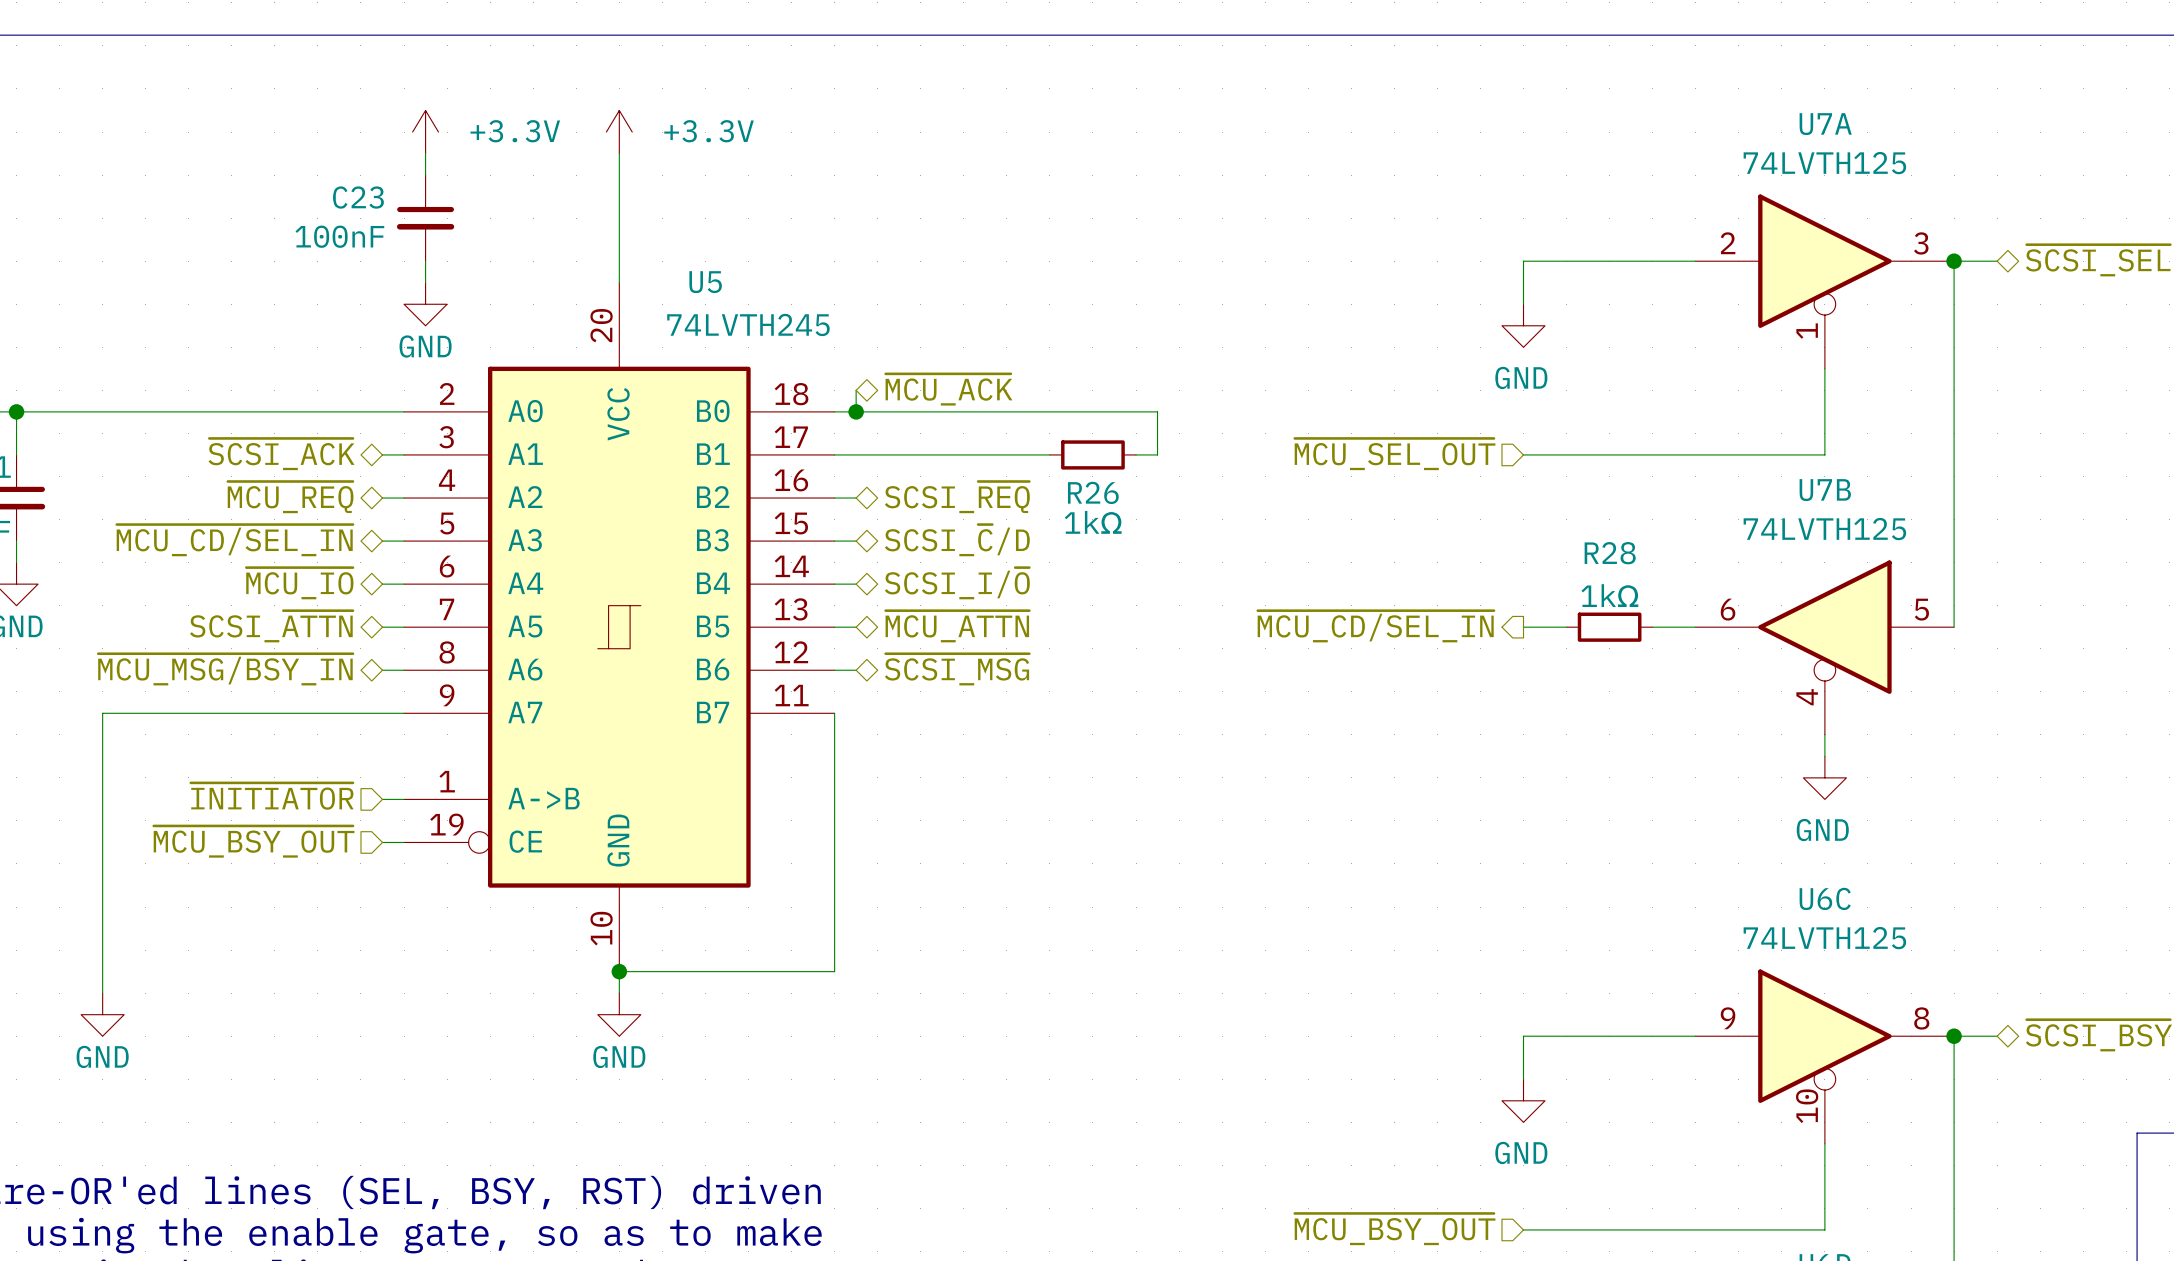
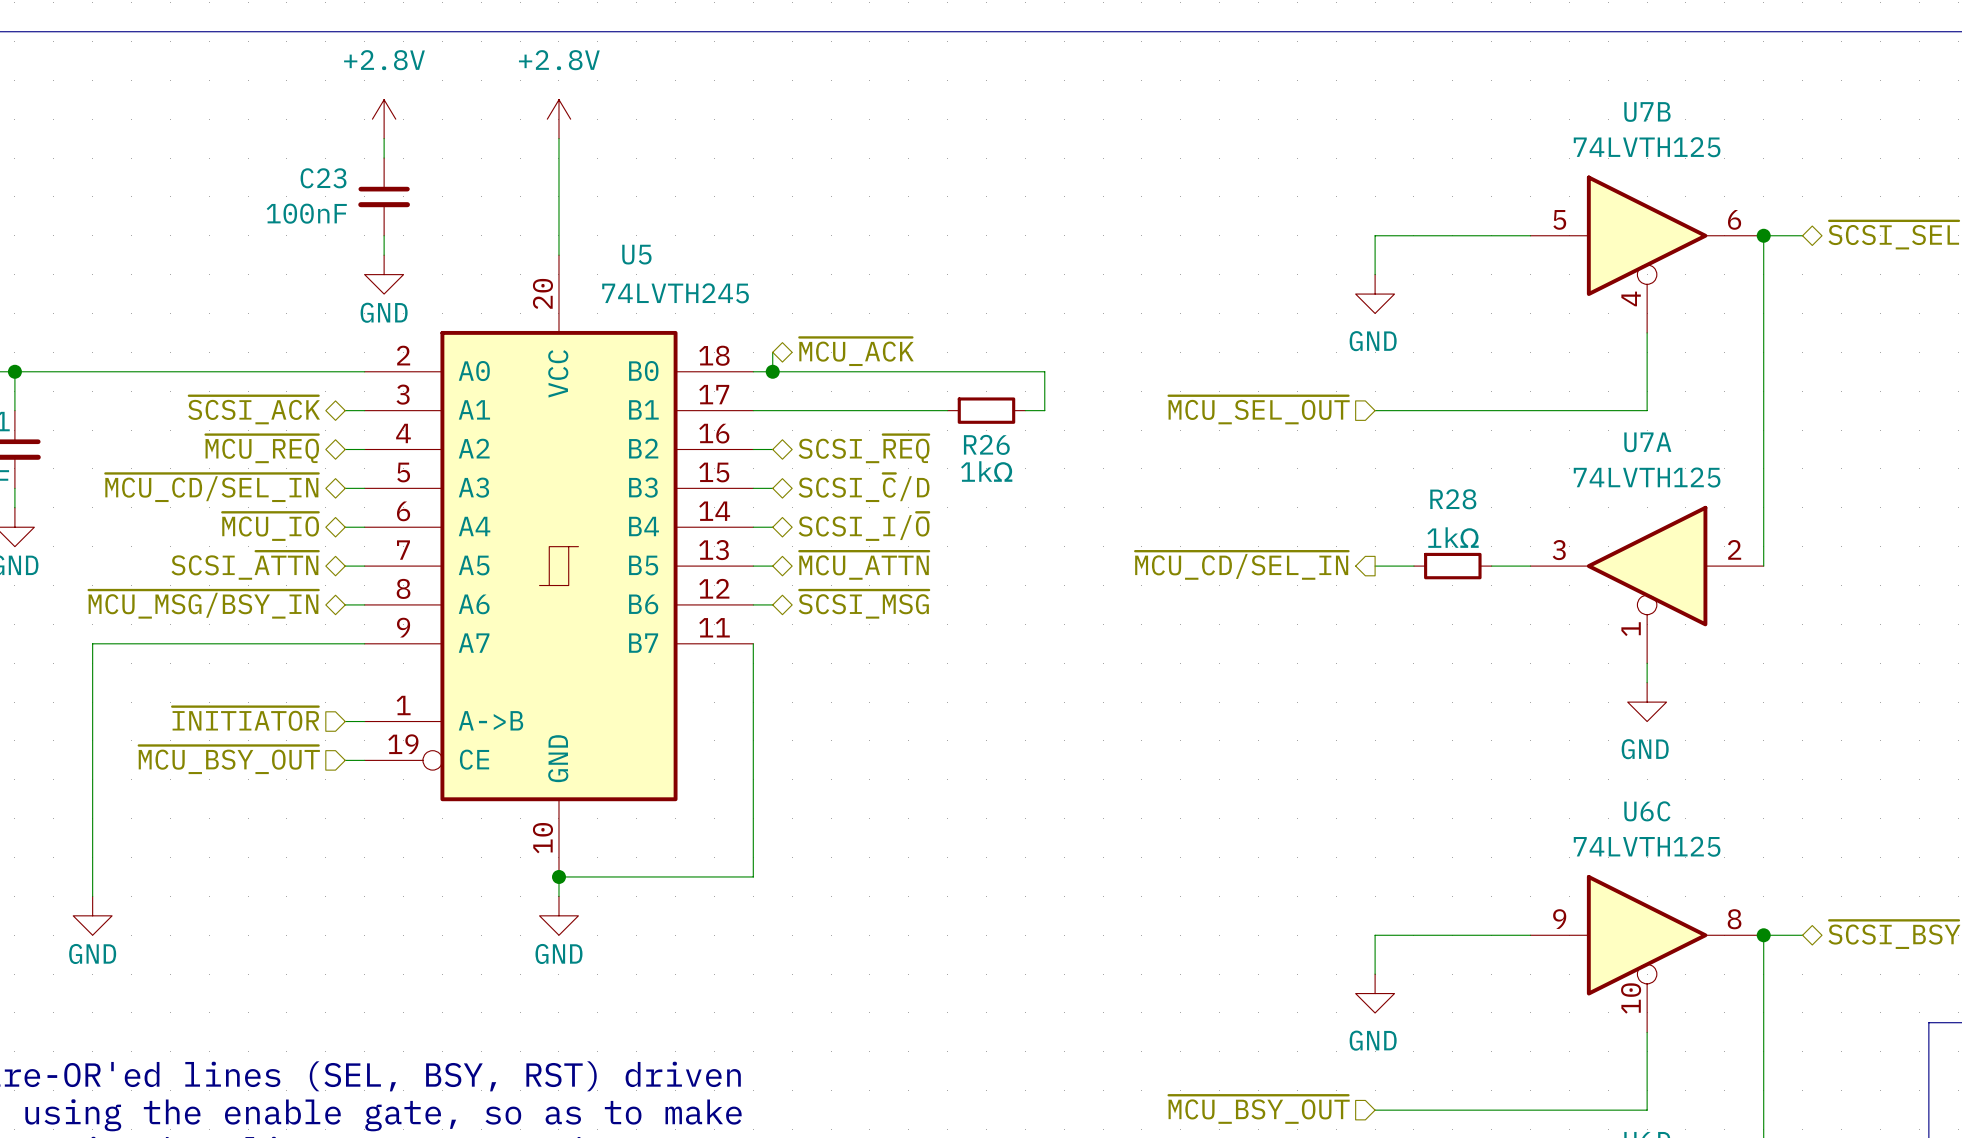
power symbol: +3.3V (425, 132) -> +2.8V (384, 119)
power symbol: +3.3V (619, 132) -> +2.8V (558, 119)
U7A flip: as is (1824, 261) -> left-right (1647, 566)
U7A position: (1824, 281) -> (1647, 584)
U7B flip: as is (1824, 627) -> left-right (1647, 235)
U7B position: (1824, 647) -> (1647, 254)

